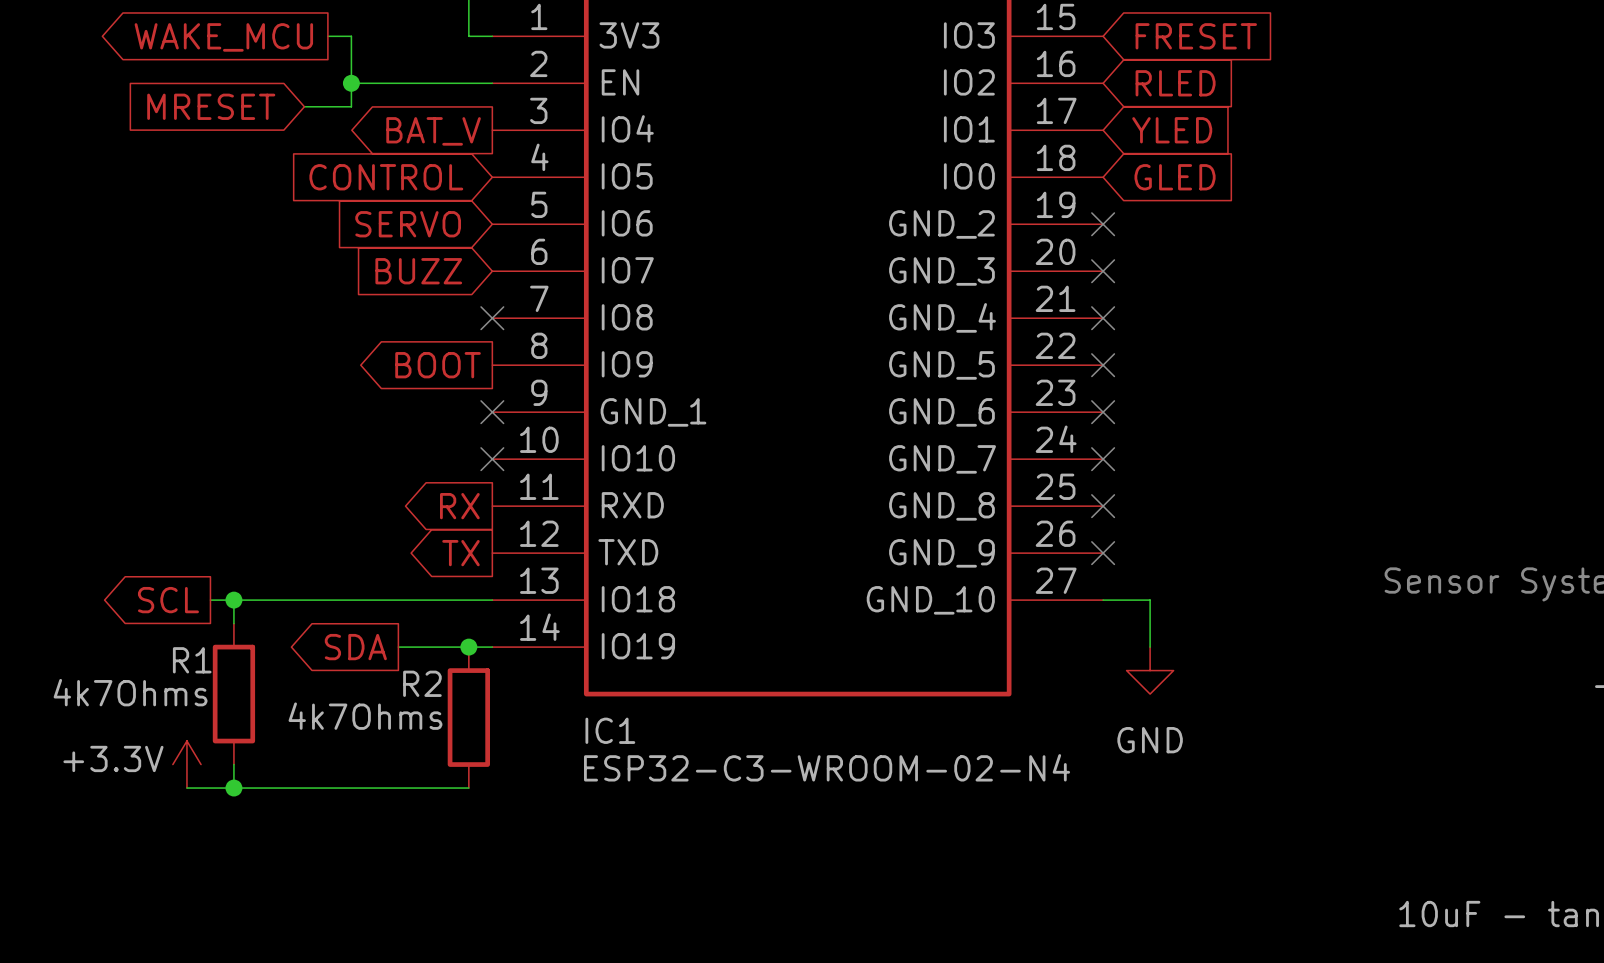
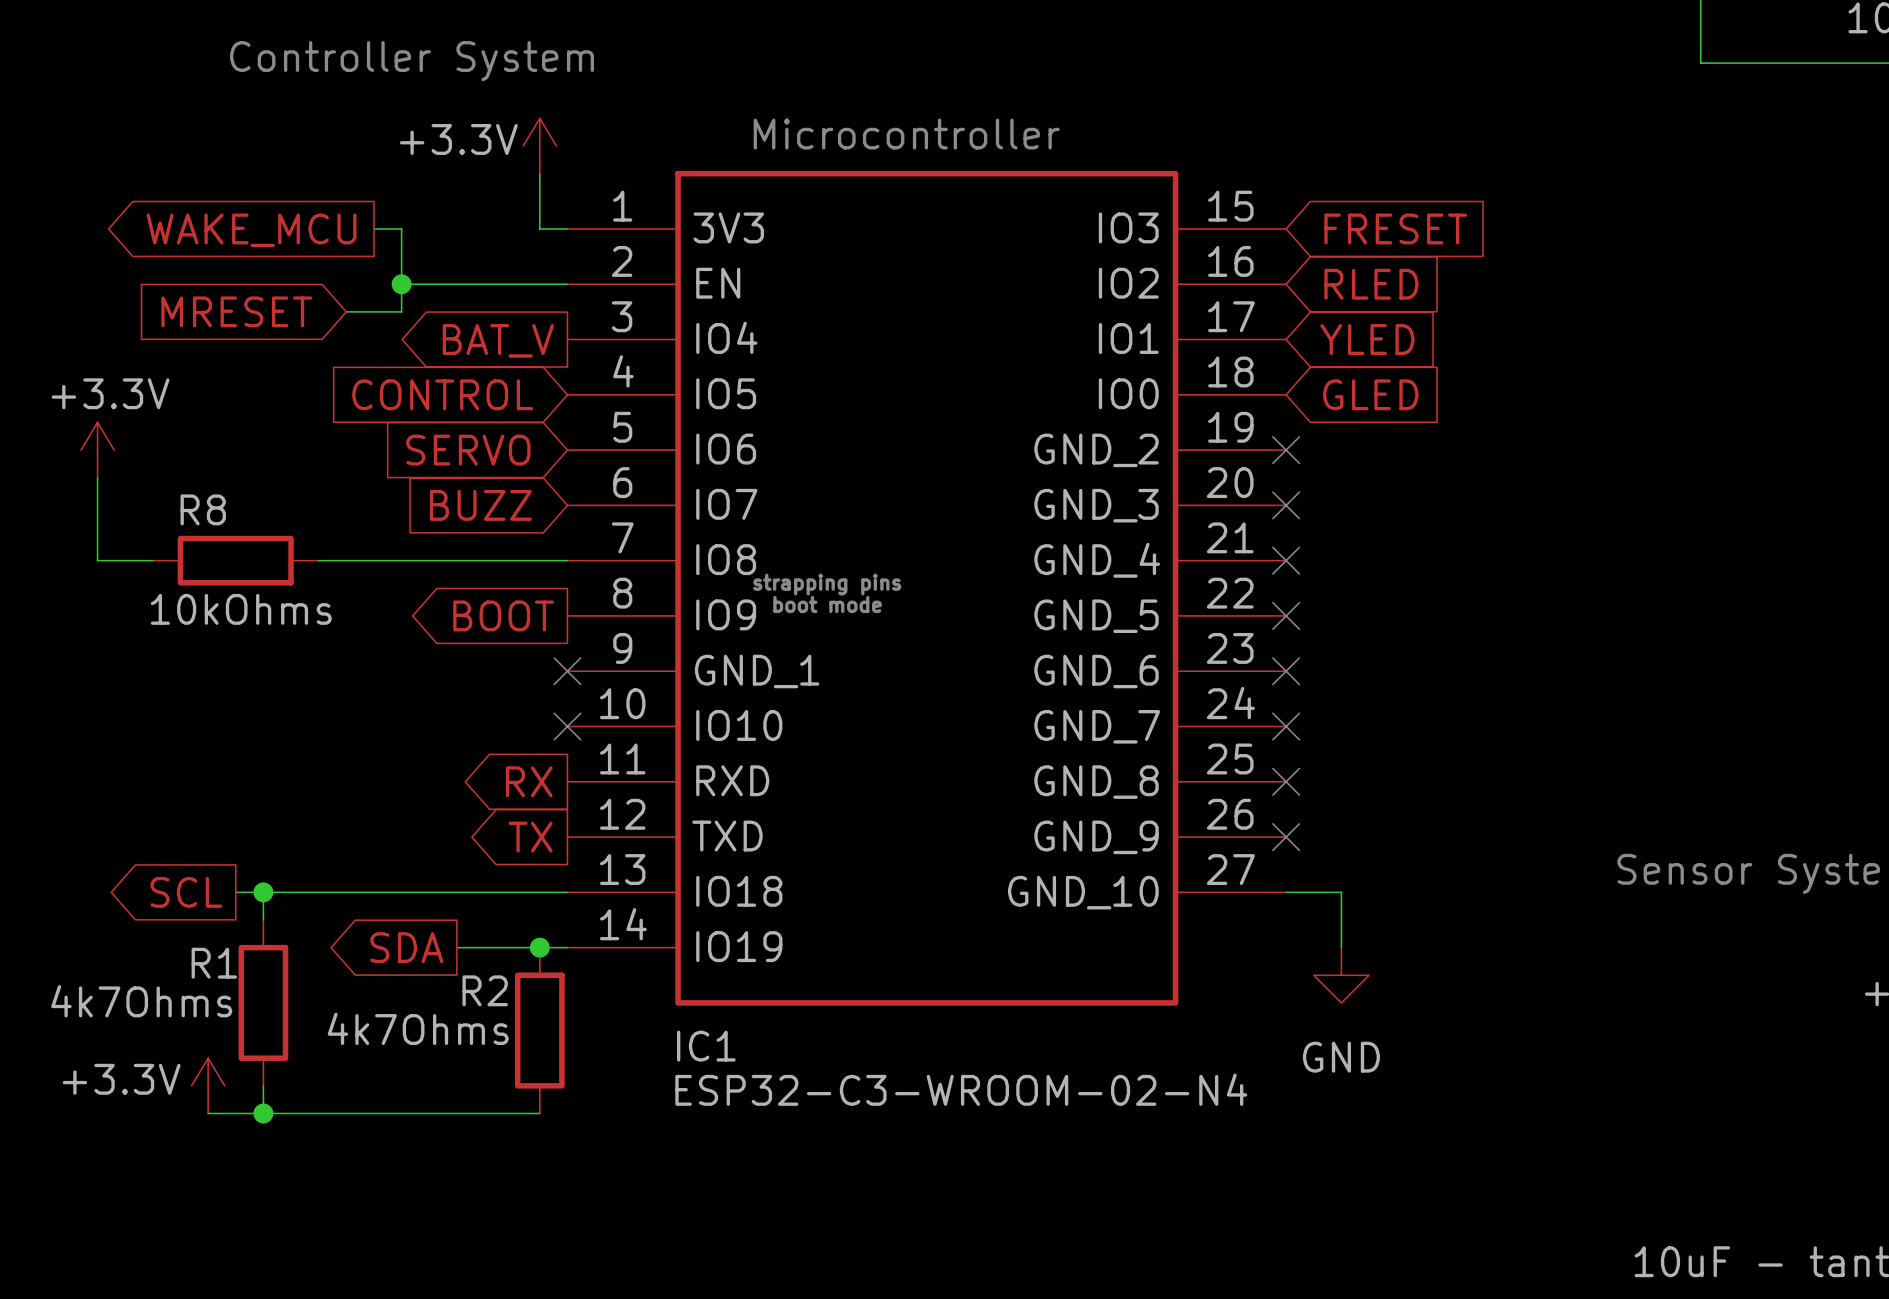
power symbol: none -> +3.3V (97, 450)
wire: none -> (97, 477) (97, 560) (152, 560)
R8: none -> 10kOhms (235, 560)
wire: none -> (318, 560) (567, 560)
no-connect mark: (492, 318) -> none
text: none -> strapping pins (827, 584)
text: none -> boot mode (827, 604)

